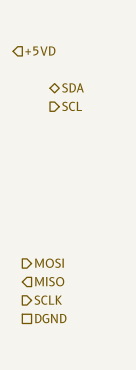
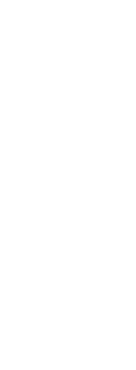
hierarchical label: +5VD (40, 51) -> none
hierarchical label: SDA (73, 87) -> none
hierarchical label: SCL (72, 106) -> none
hierarchical label: MOSI (49, 263) -> none
hierarchical label: MISO (49, 281) -> none
hierarchical label: SCLK (48, 300) -> none
hierarchical label: DGND (50, 318) -> none

